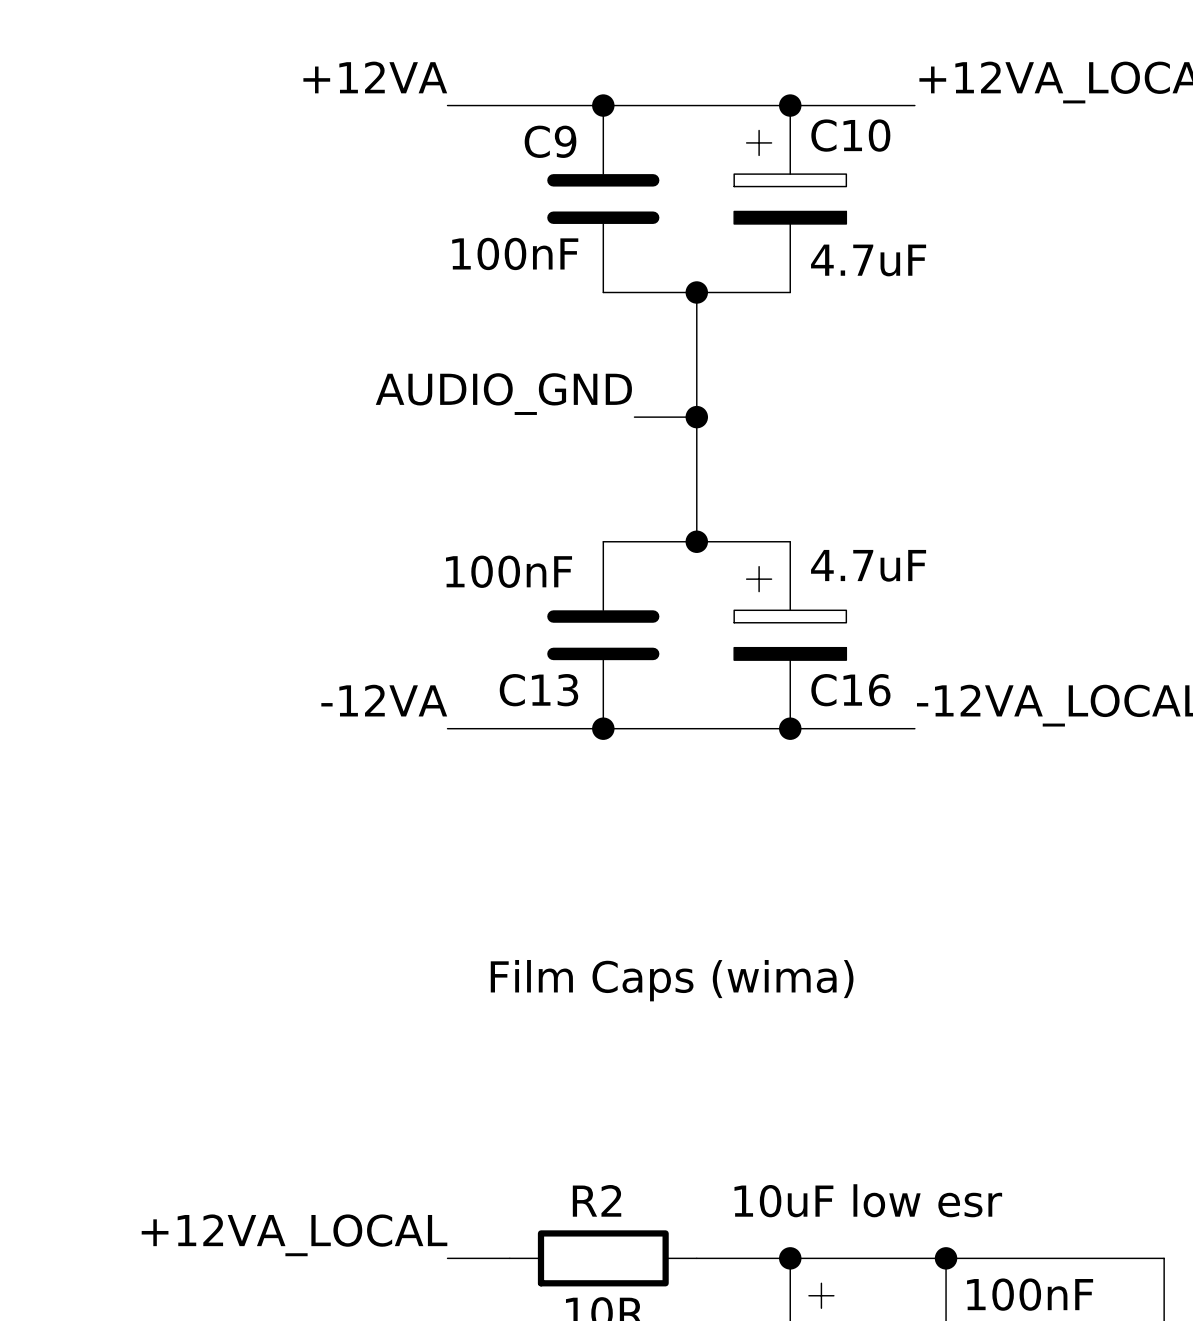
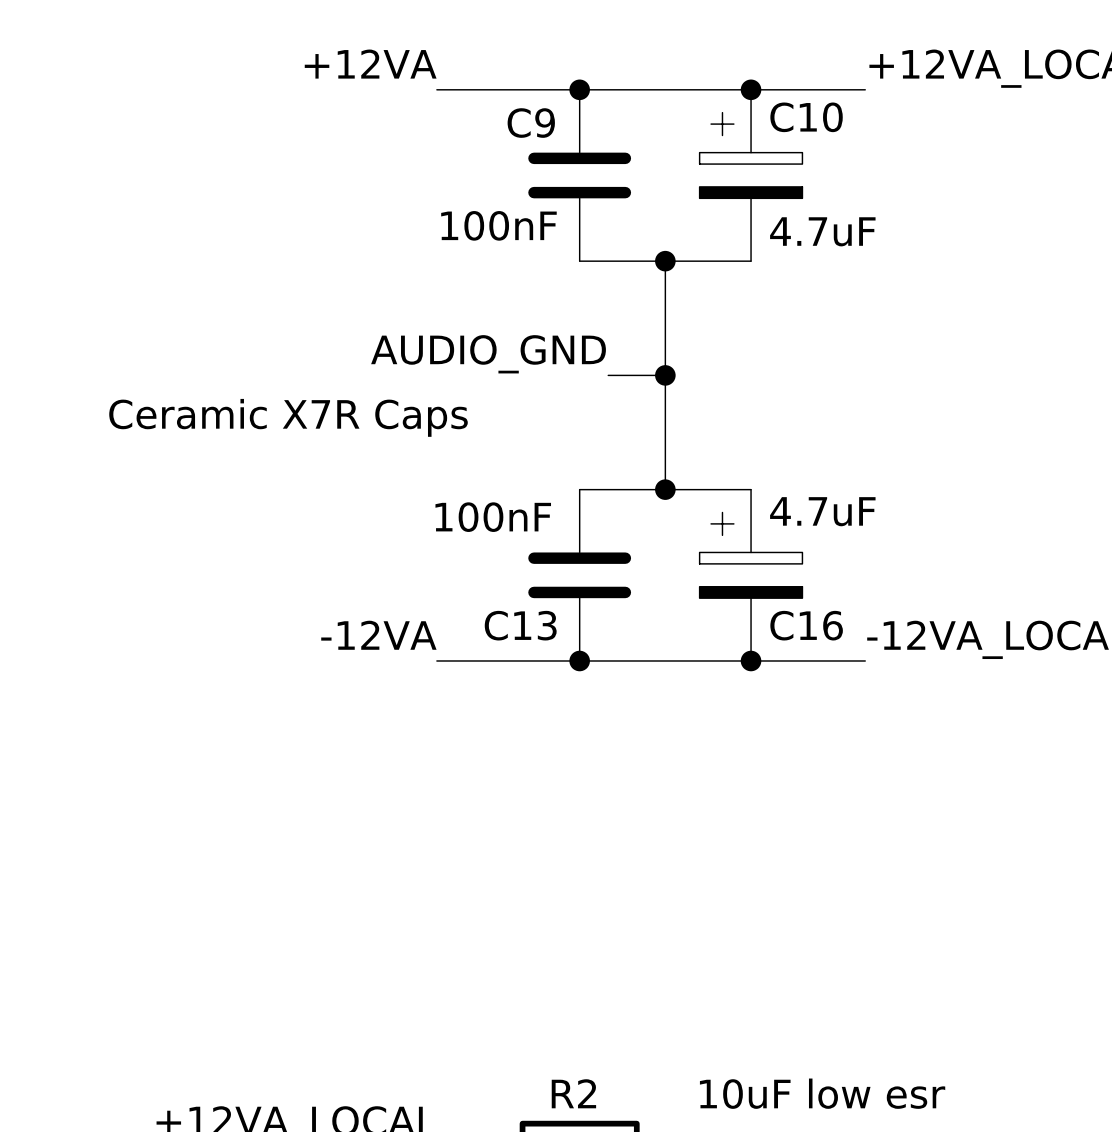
text: none -> Ceramic X7R Caps (288, 417)
text: Film Caps (wima) (672, 980) -> none

